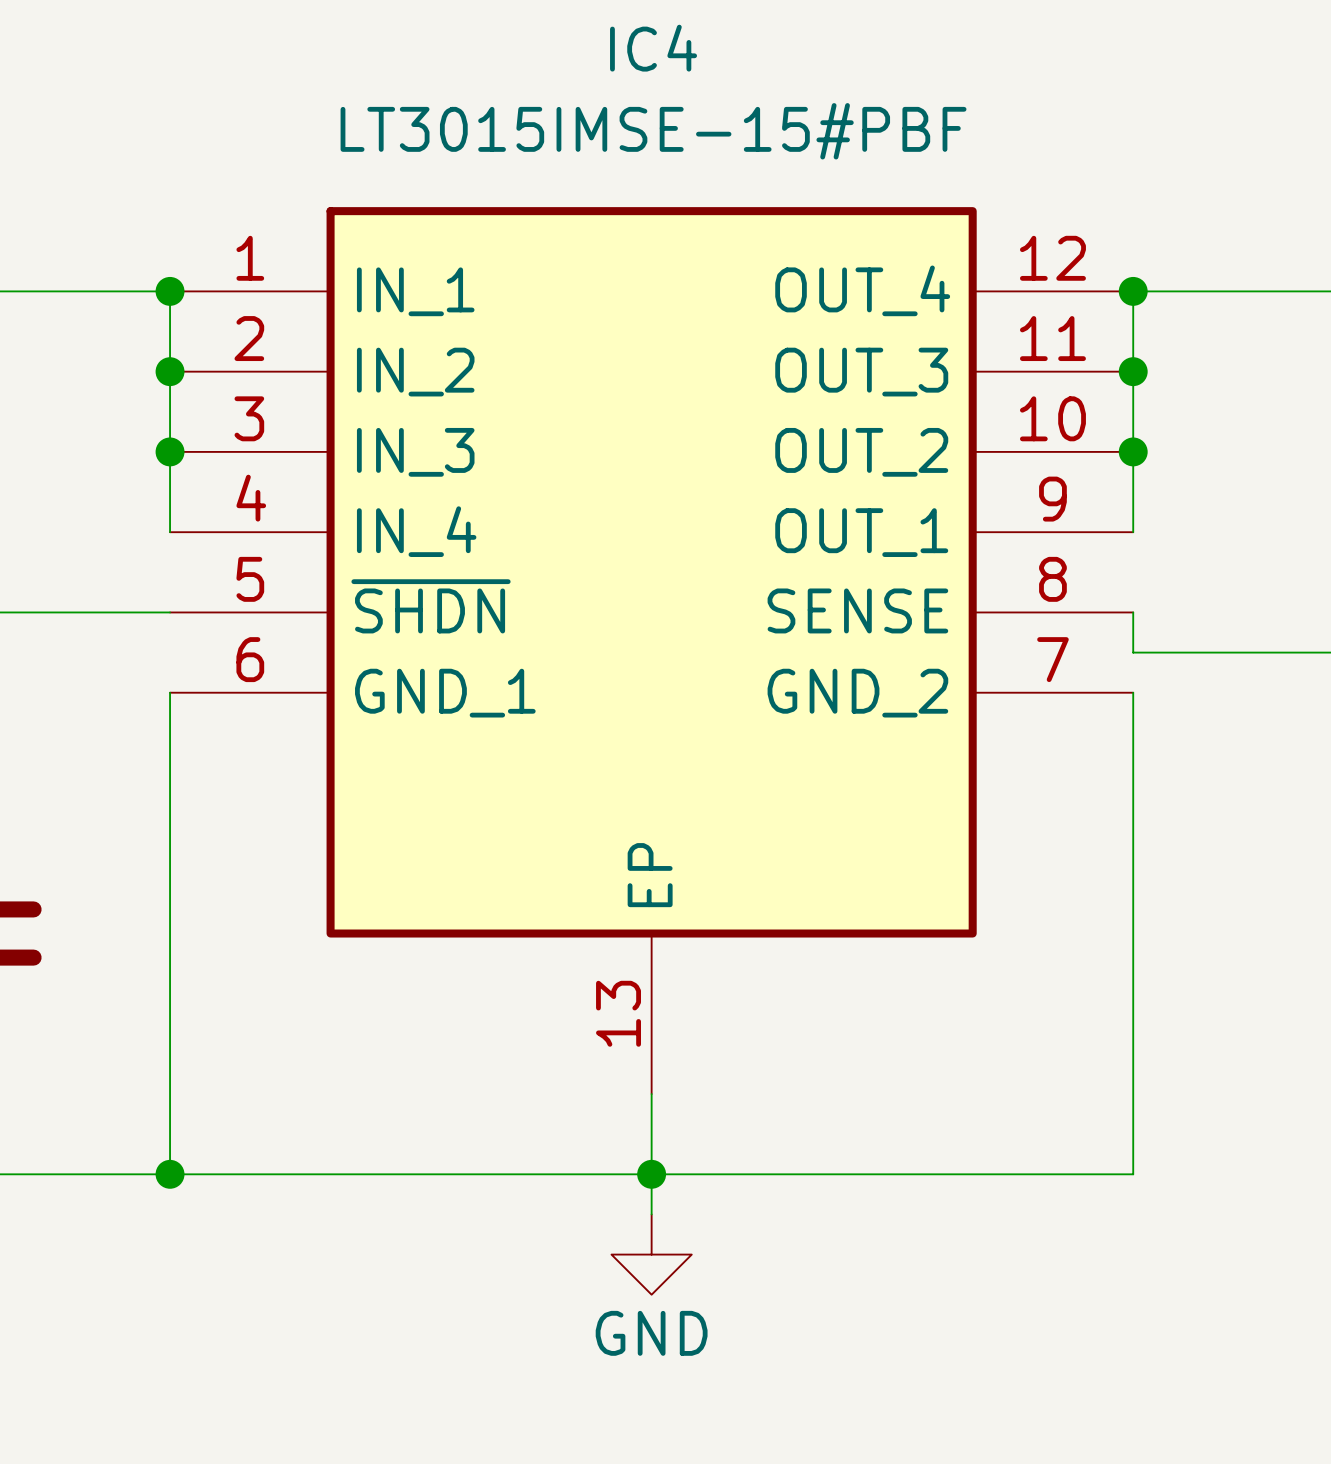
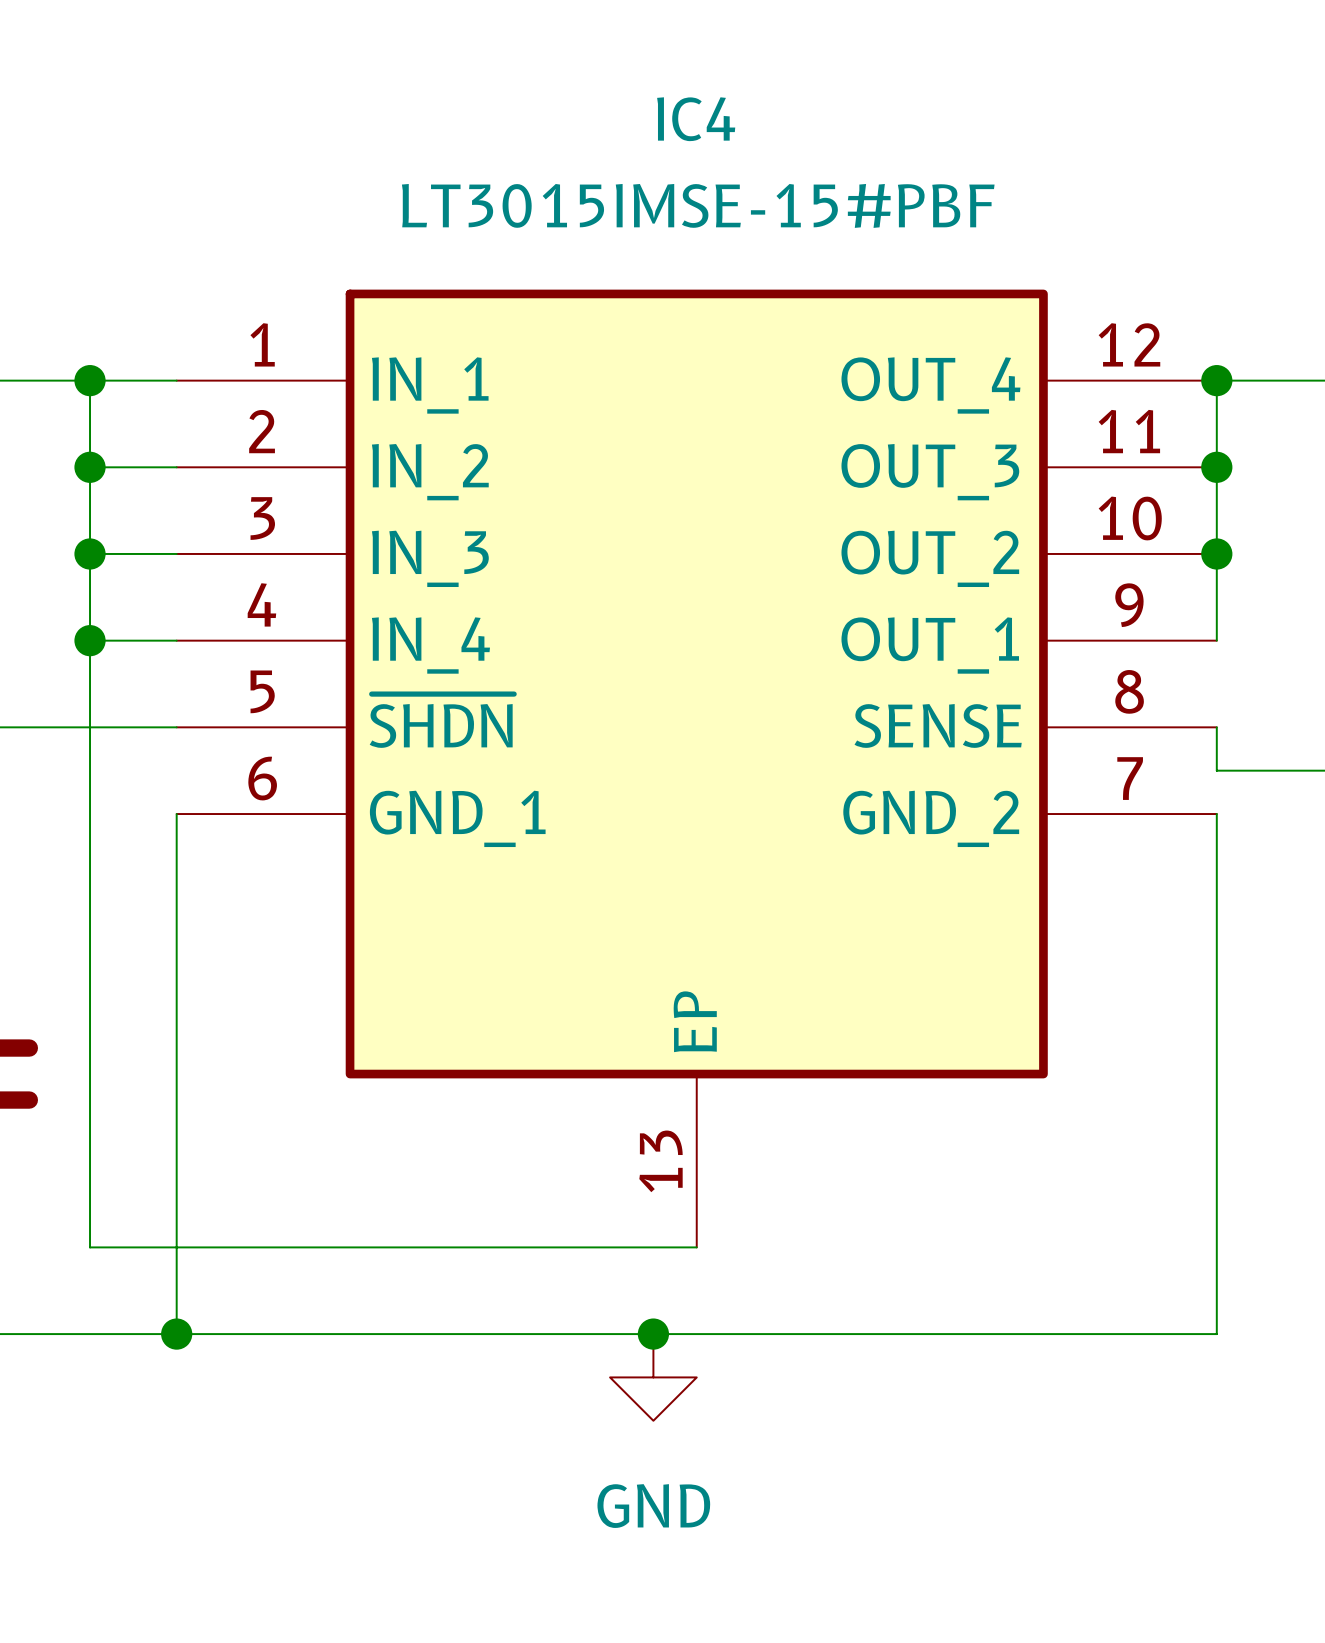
junction: none -> (90, 380)
wire: (170, 291) (170, 532) -> (90, 640) (176, 640)
junction: (170, 291) -> none
wire: none -> (90, 467) (176, 467)
junction: none -> (90, 467)
junction: (170, 371) -> none
wire: none -> (90, 553) (176, 553)
junction: none -> (90, 553)
junction: (170, 451) -> none
junction: none -> (90, 640)
wire: (651, 1094) (651, 1214) -> (696, 1247) (90, 1247) (90, 380)
junction position: (651, 1174) -> (653, 1334)
power symbol position: GND (651, 1254) -> GND (653, 1377)
power symbol text position: GND (651, 1333) -> GND (653, 1506)

